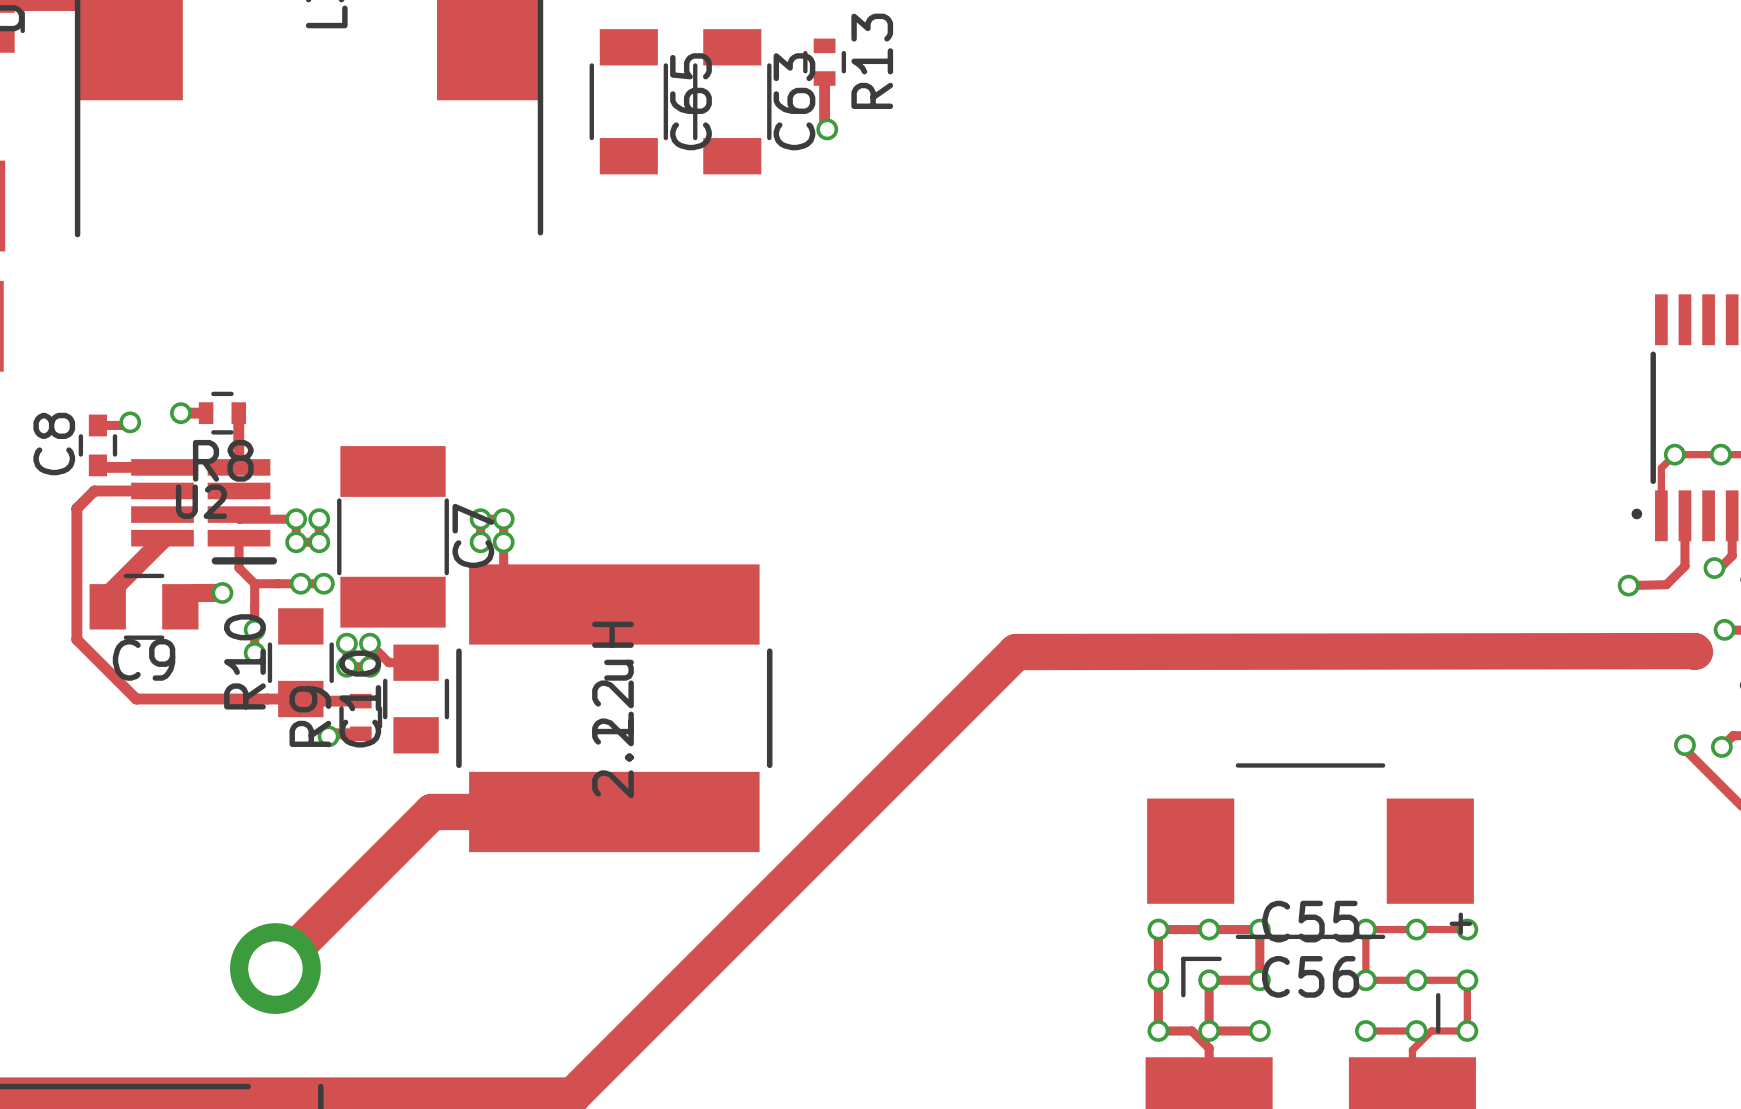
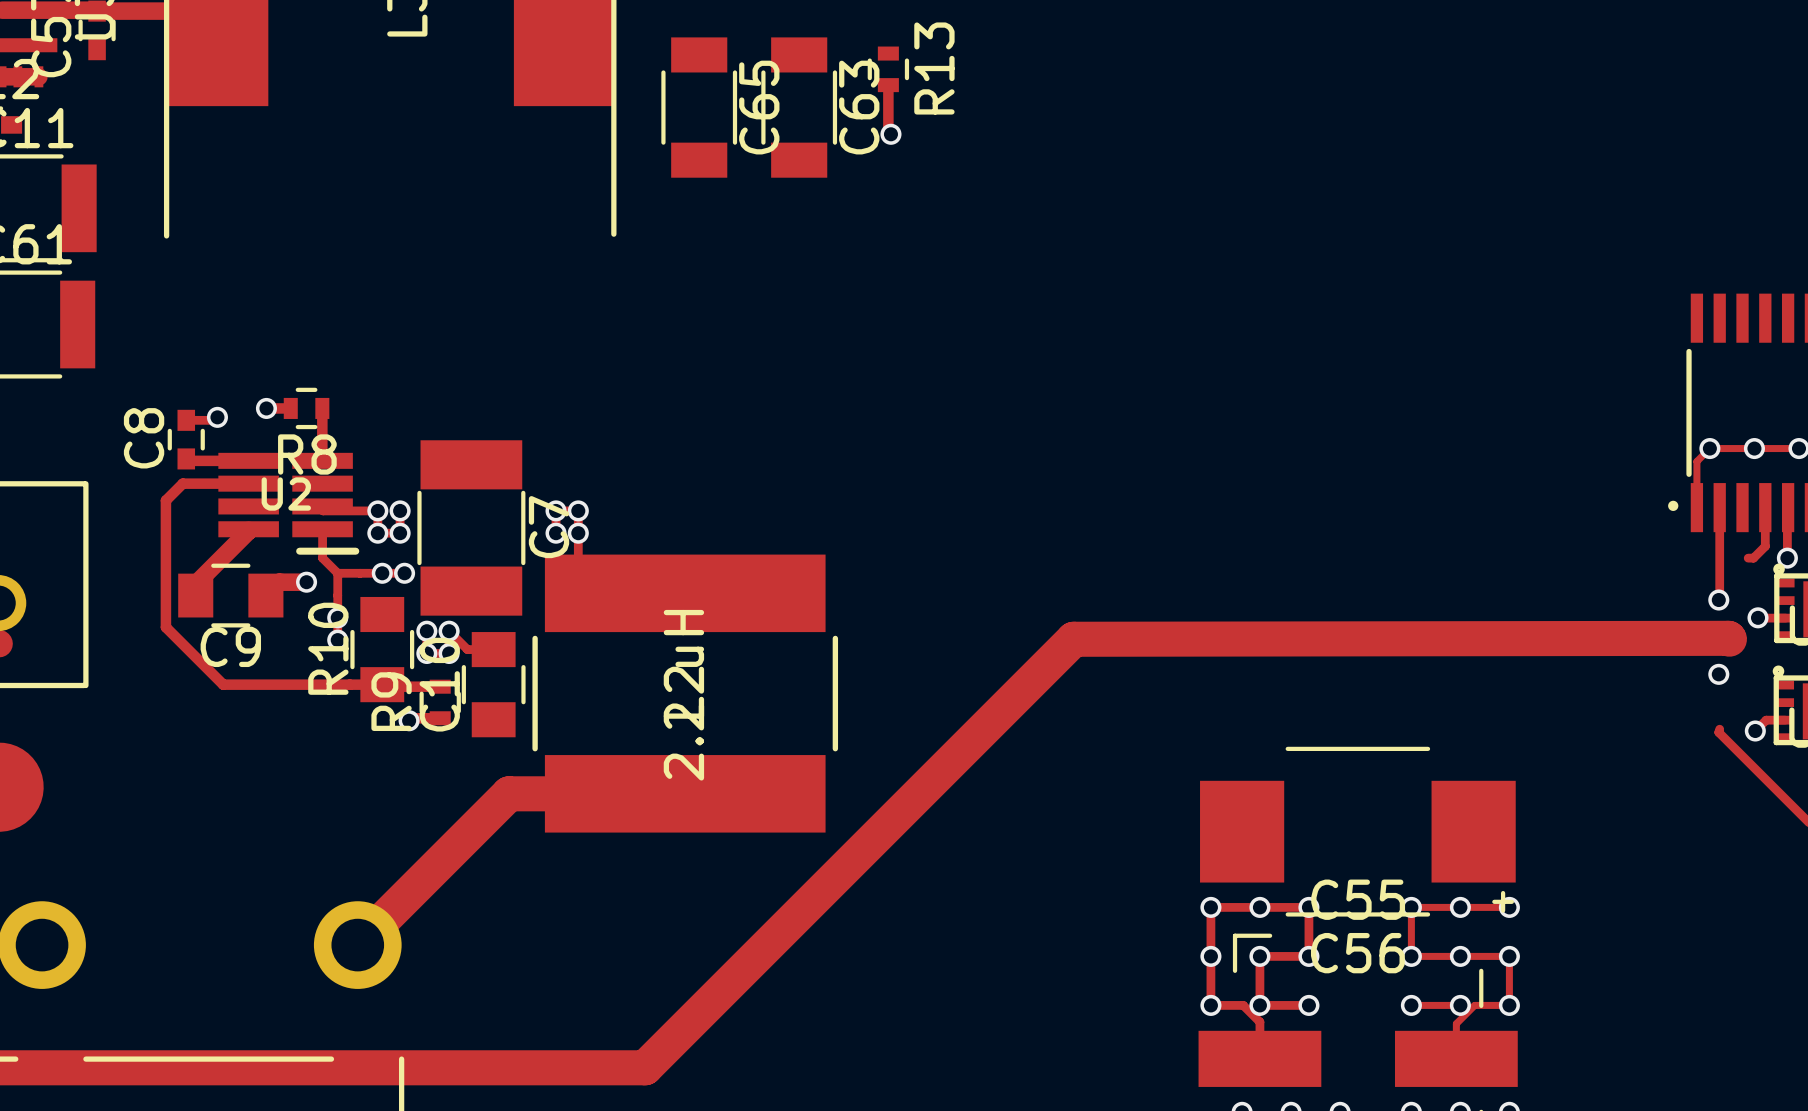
track: (1684, 566) (1666, 584) (1629, 584) -> (1719, 556) (1718, 600)
via: (1714, 568) -> none
via: (1628, 585) -> none
via: none -> (1718, 600)
via position: (1684, 745) -> (1718, 674)

